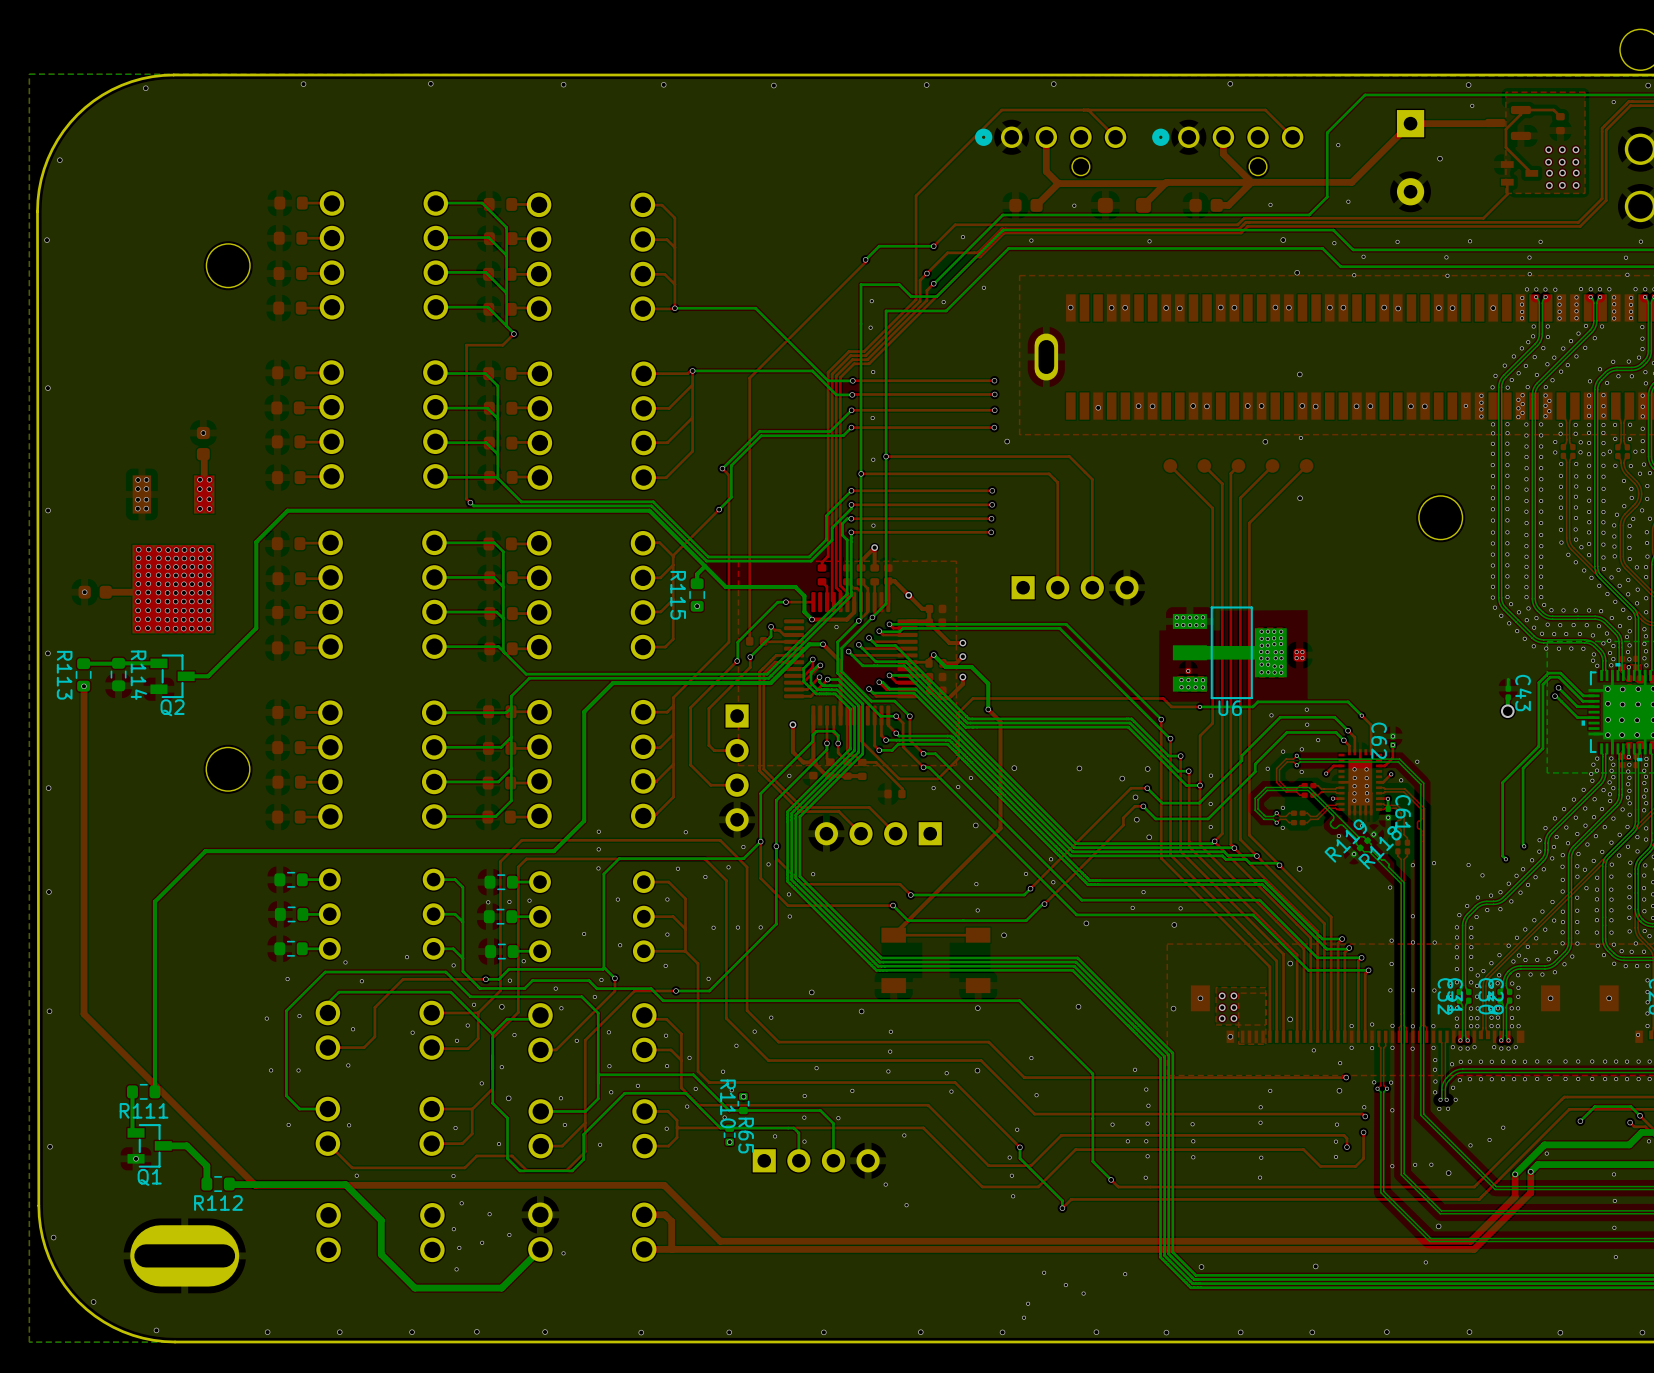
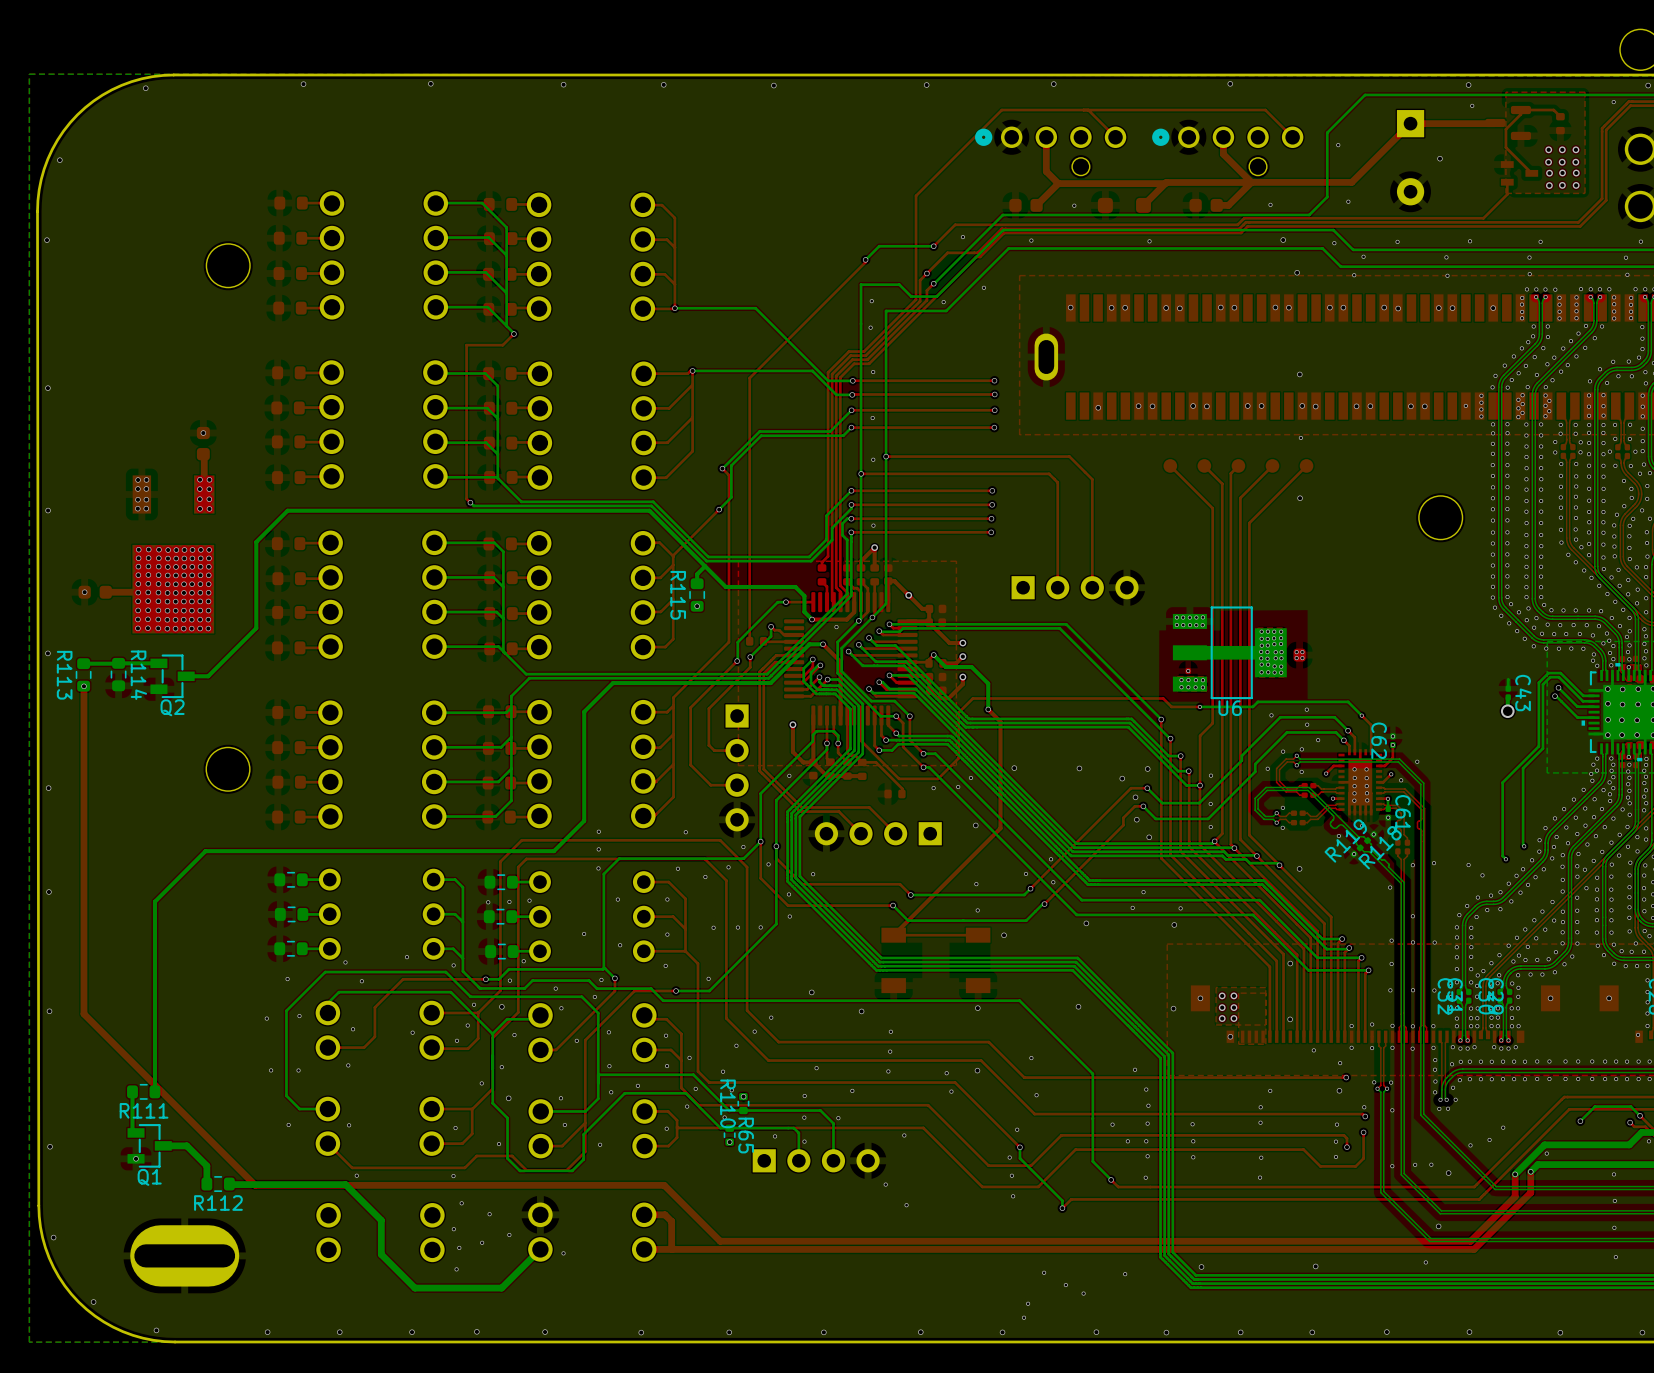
via: (1007, 441) -> none
via: (1265, 441) -> none

